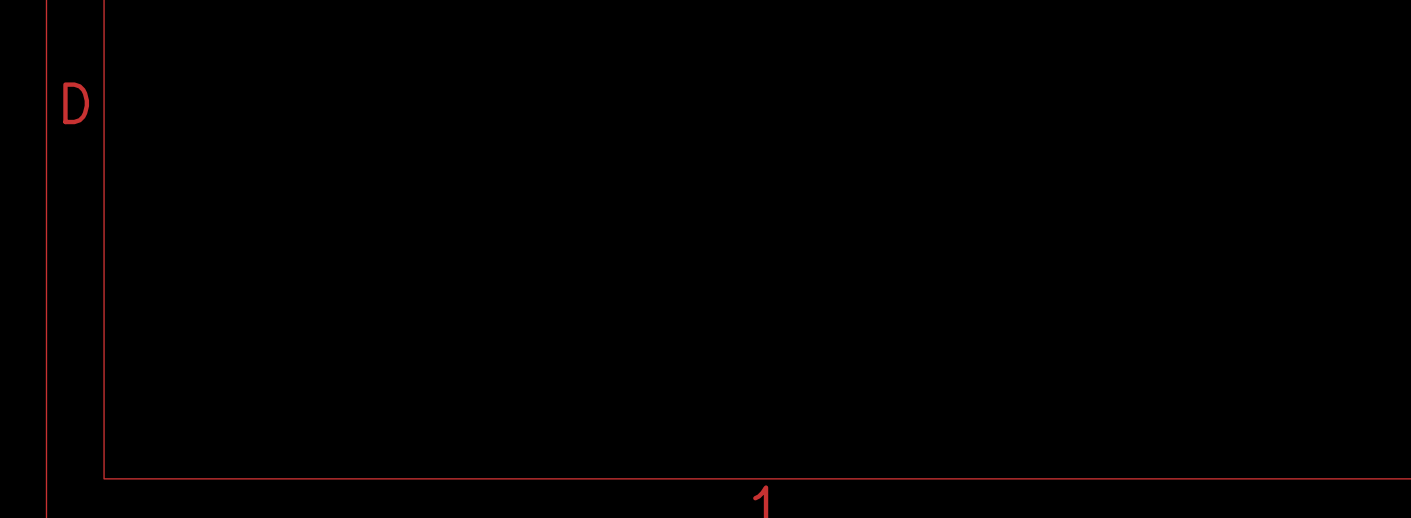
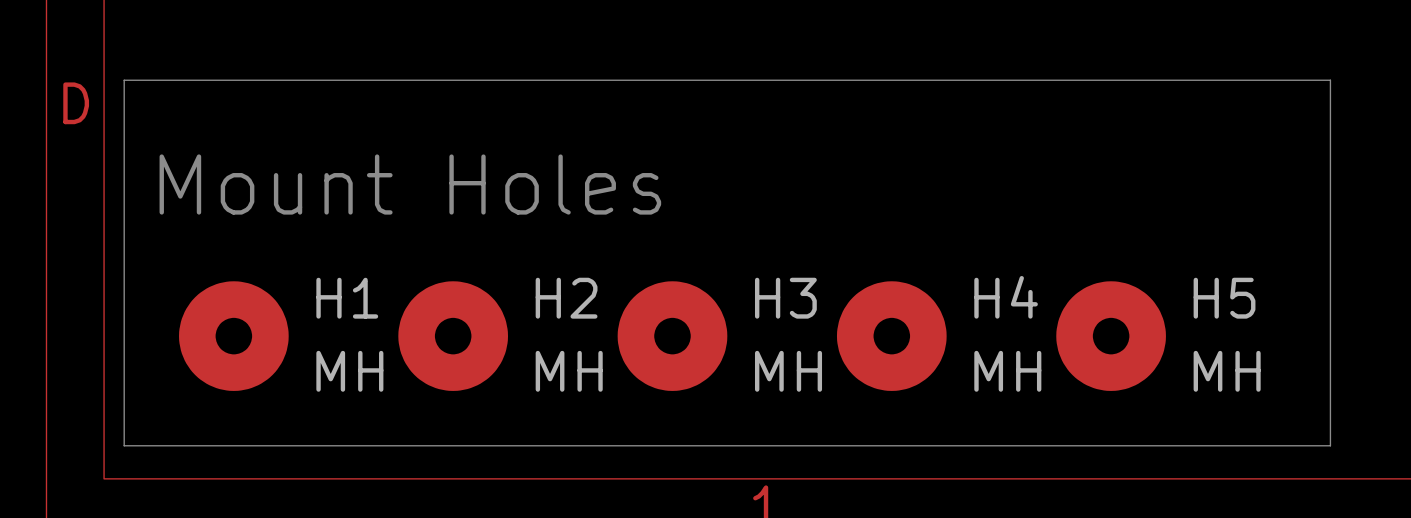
line: none -> (124, 80) (1330, 80) (1330, 445) (124, 445) (124, 80)
text: none -> Mount Holes (410, 184)
H1: none -> MH (233, 336)
H2: none -> MH (453, 336)
H3: none -> MH (672, 336)
H4: none -> MH (891, 336)
H5: none -> MH (1111, 336)

